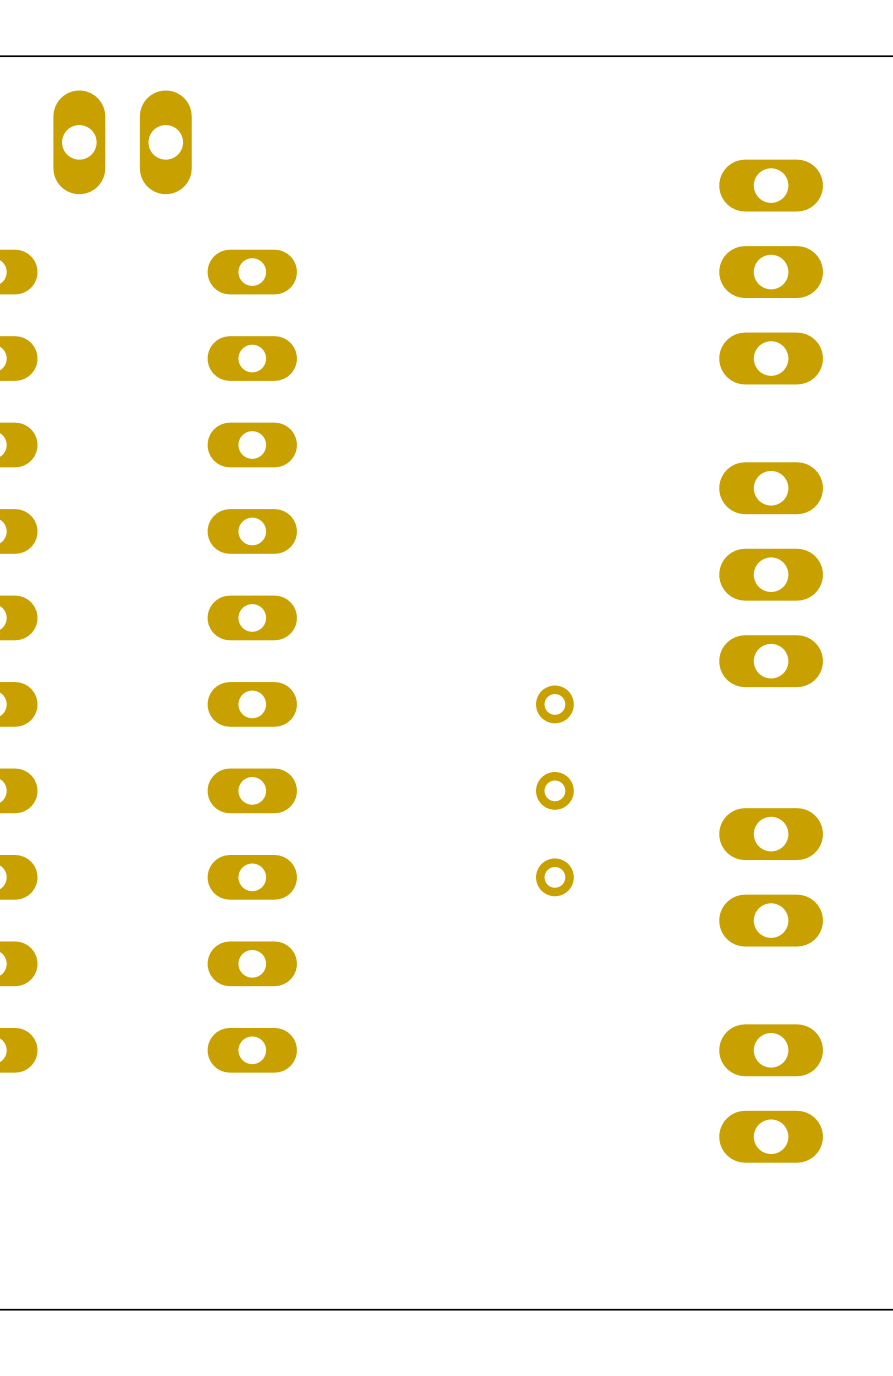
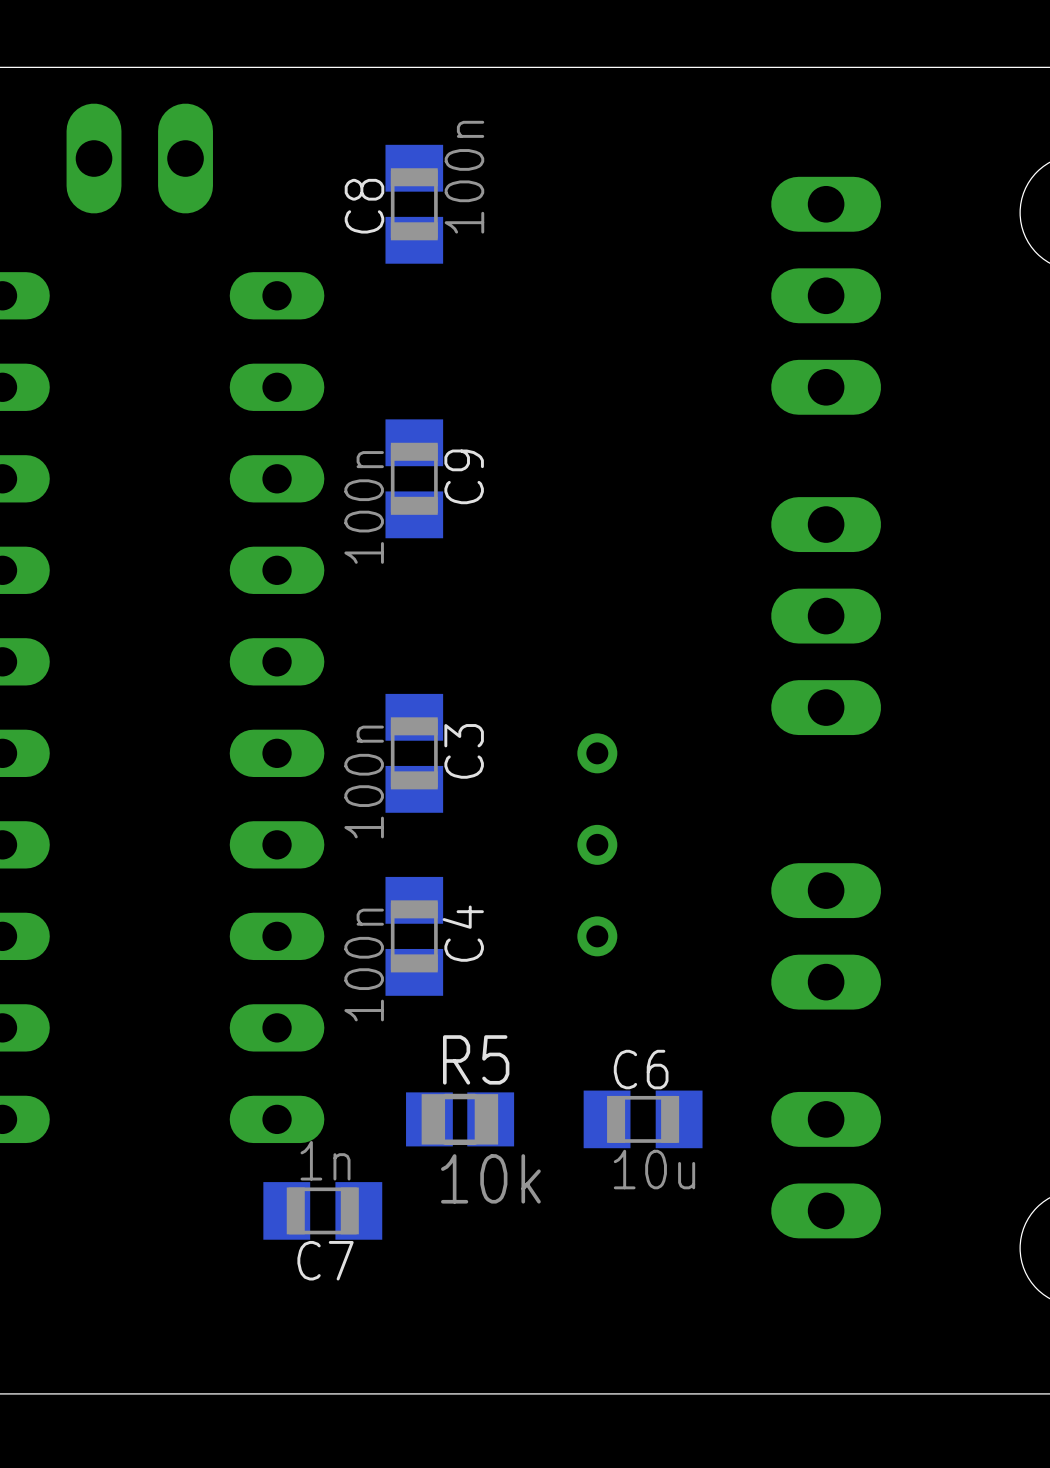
C8: none -> 100n (414, 204)
C9: none -> 100n (414, 478)
C3: none -> 100n (414, 753)
C4: none -> 100n (414, 936)
R5: none -> 10k (460, 1119)
C6: none -> 10u (643, 1119)
C7: none -> 1n (322, 1210)

